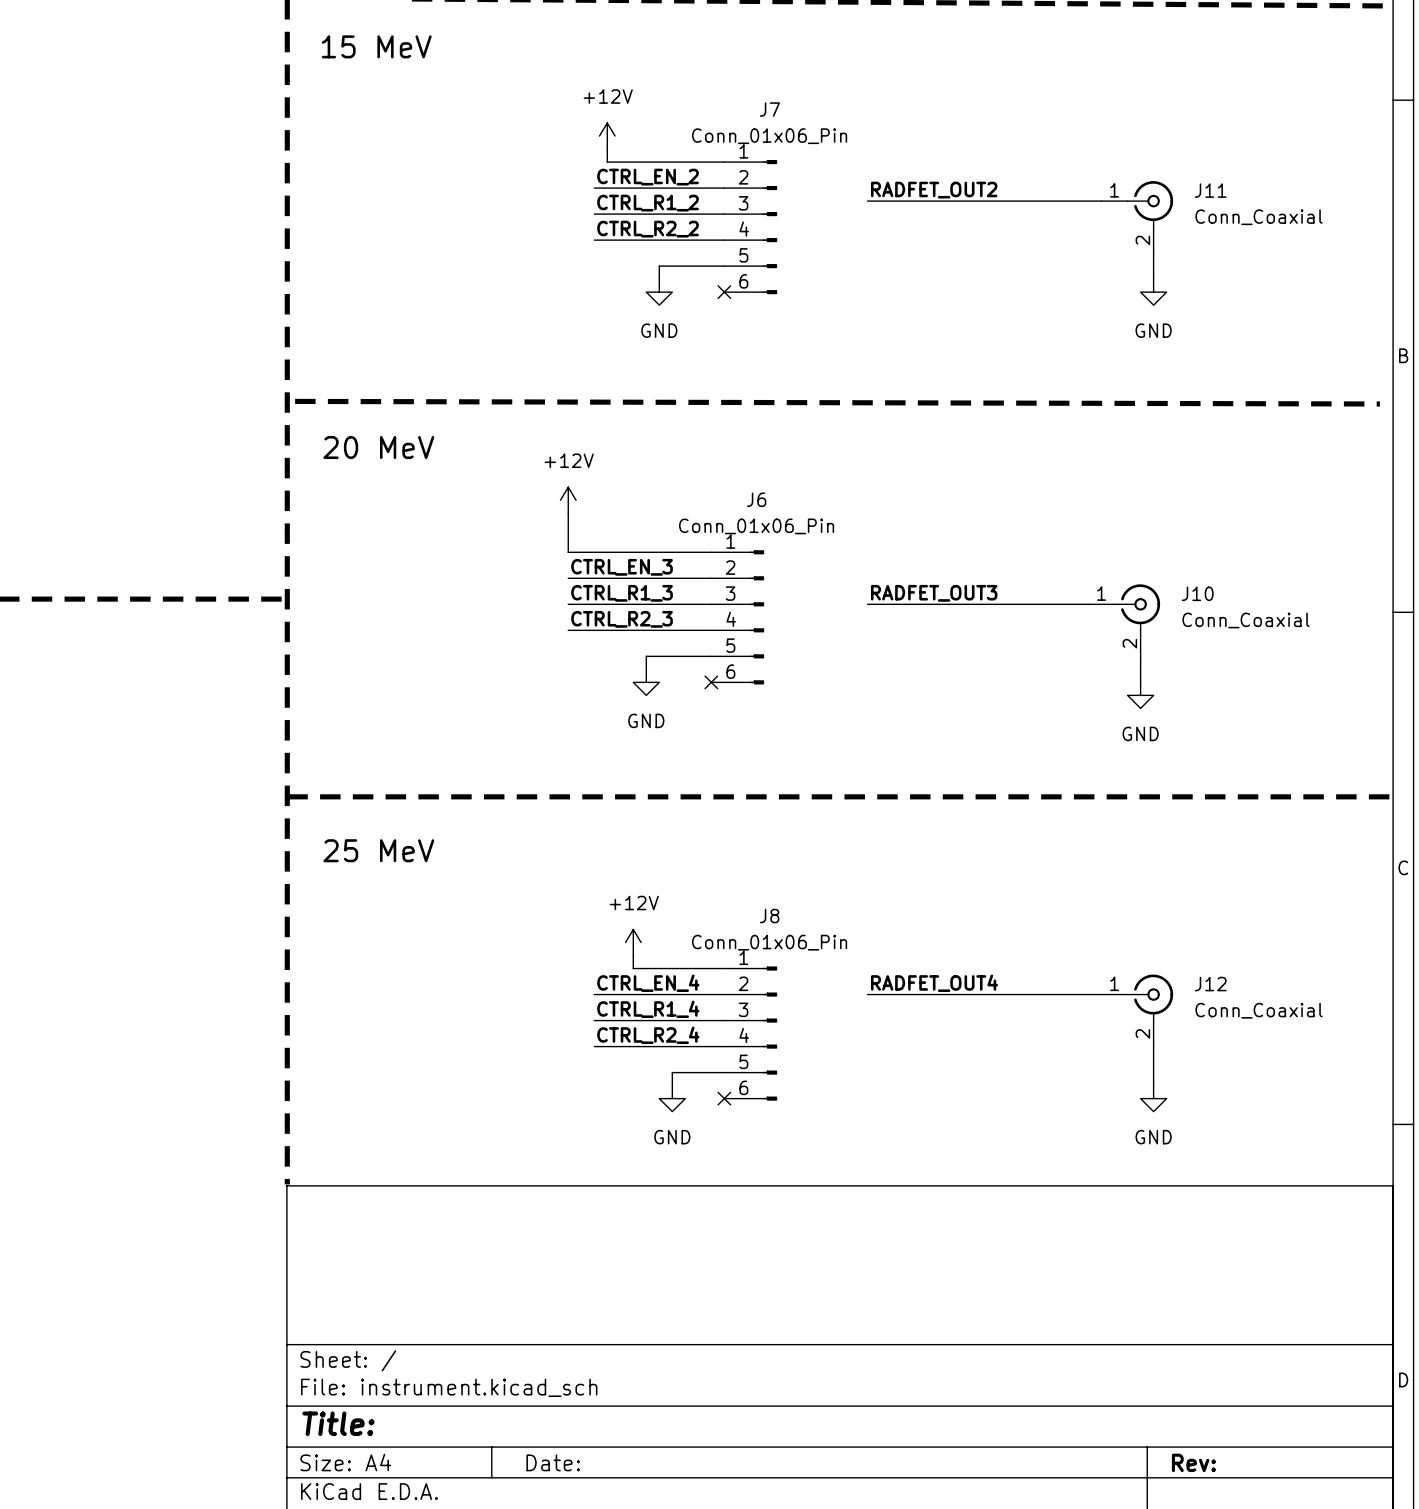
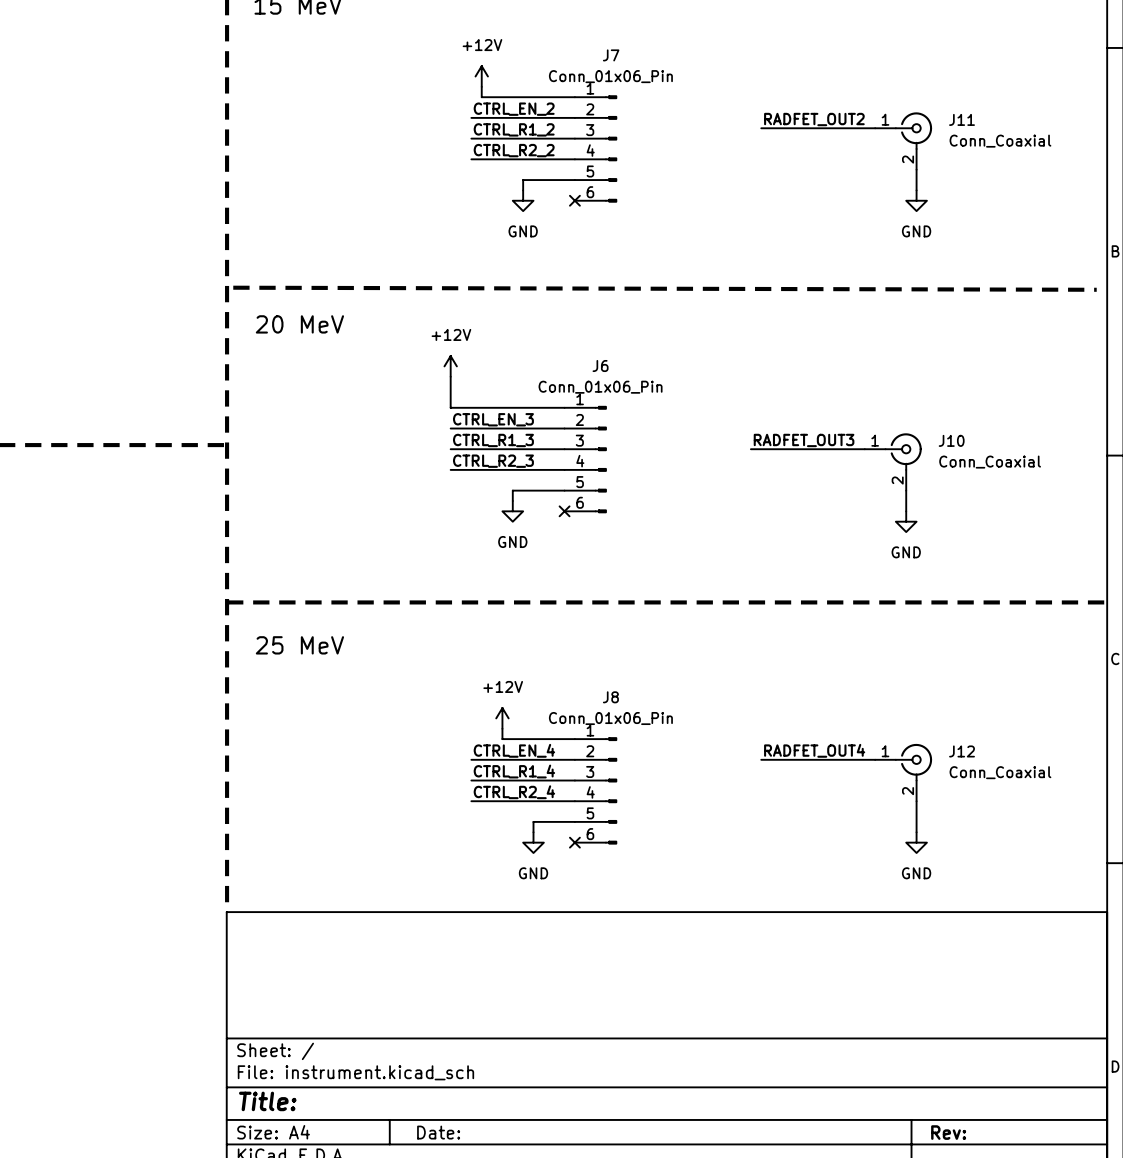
label position: RADFET_OUT2 (934, 190) -> RADFET_OUT2 (814, 119)
wire: (867, 201) (958, 201) -> none
label position: RADFET_OUT3 (934, 593) -> RADFET_OUT3 (804, 440)
wire: (867, 604) (945, 604) -> none
label position: RADFET_OUT4 (934, 983) -> RADFET_OUT4 (814, 750)
wire: (867, 994) (958, 994) -> none

